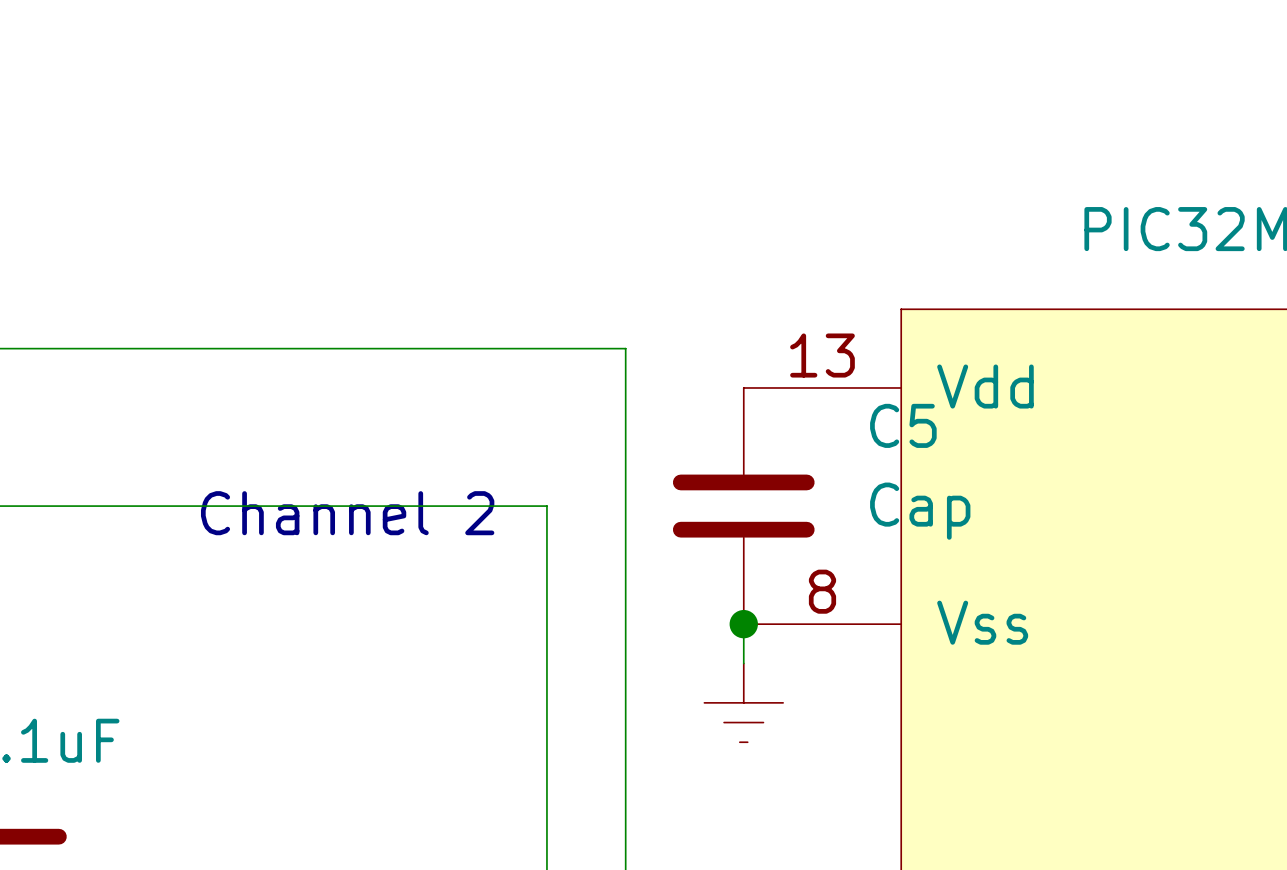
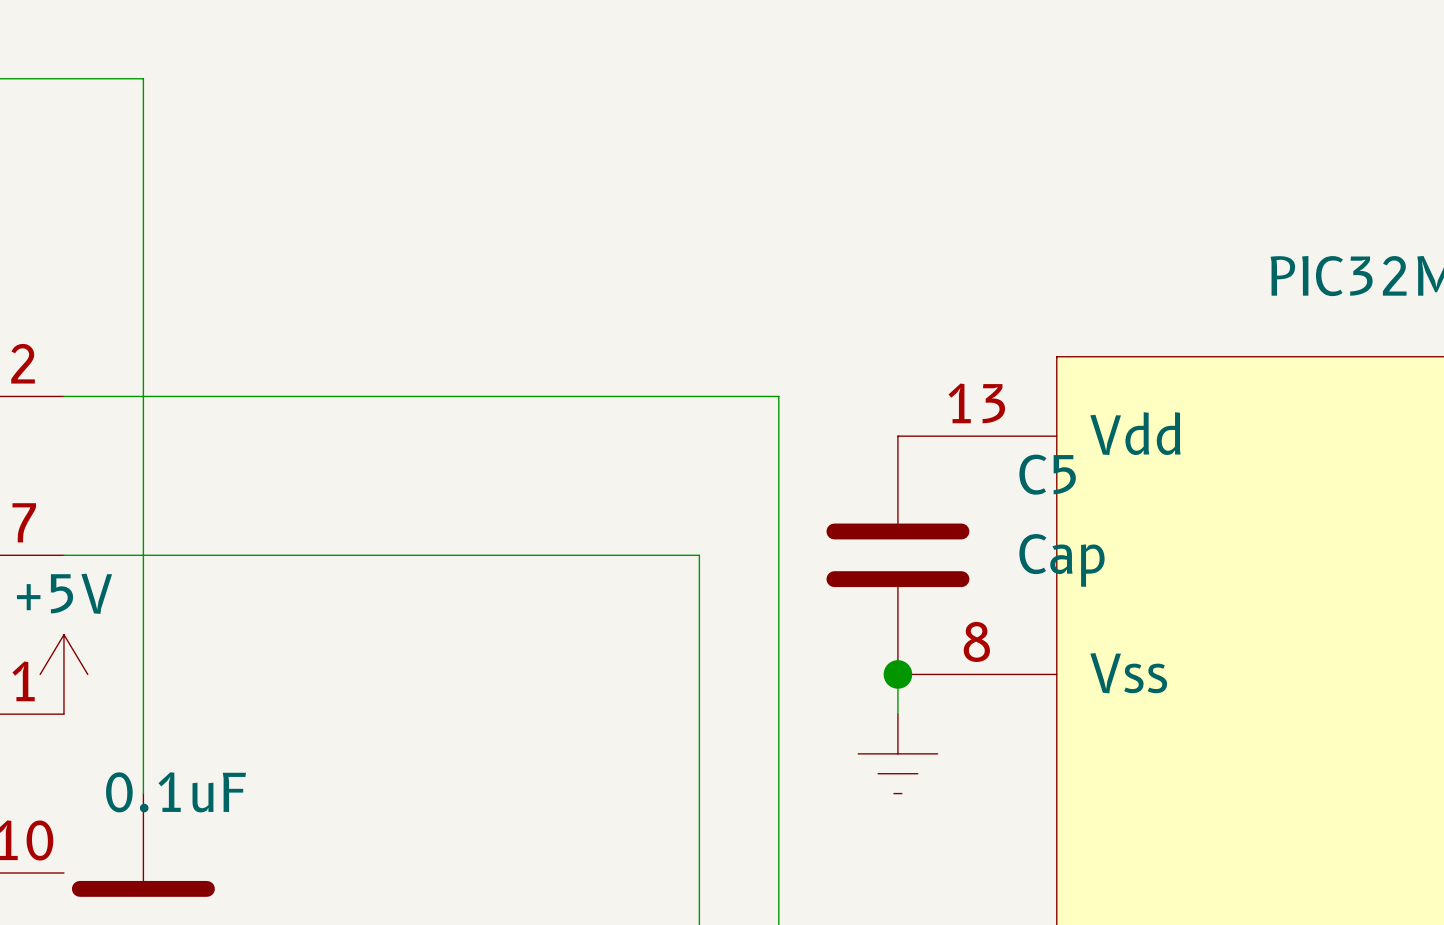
text: Channel 2 (347, 513) -> none

